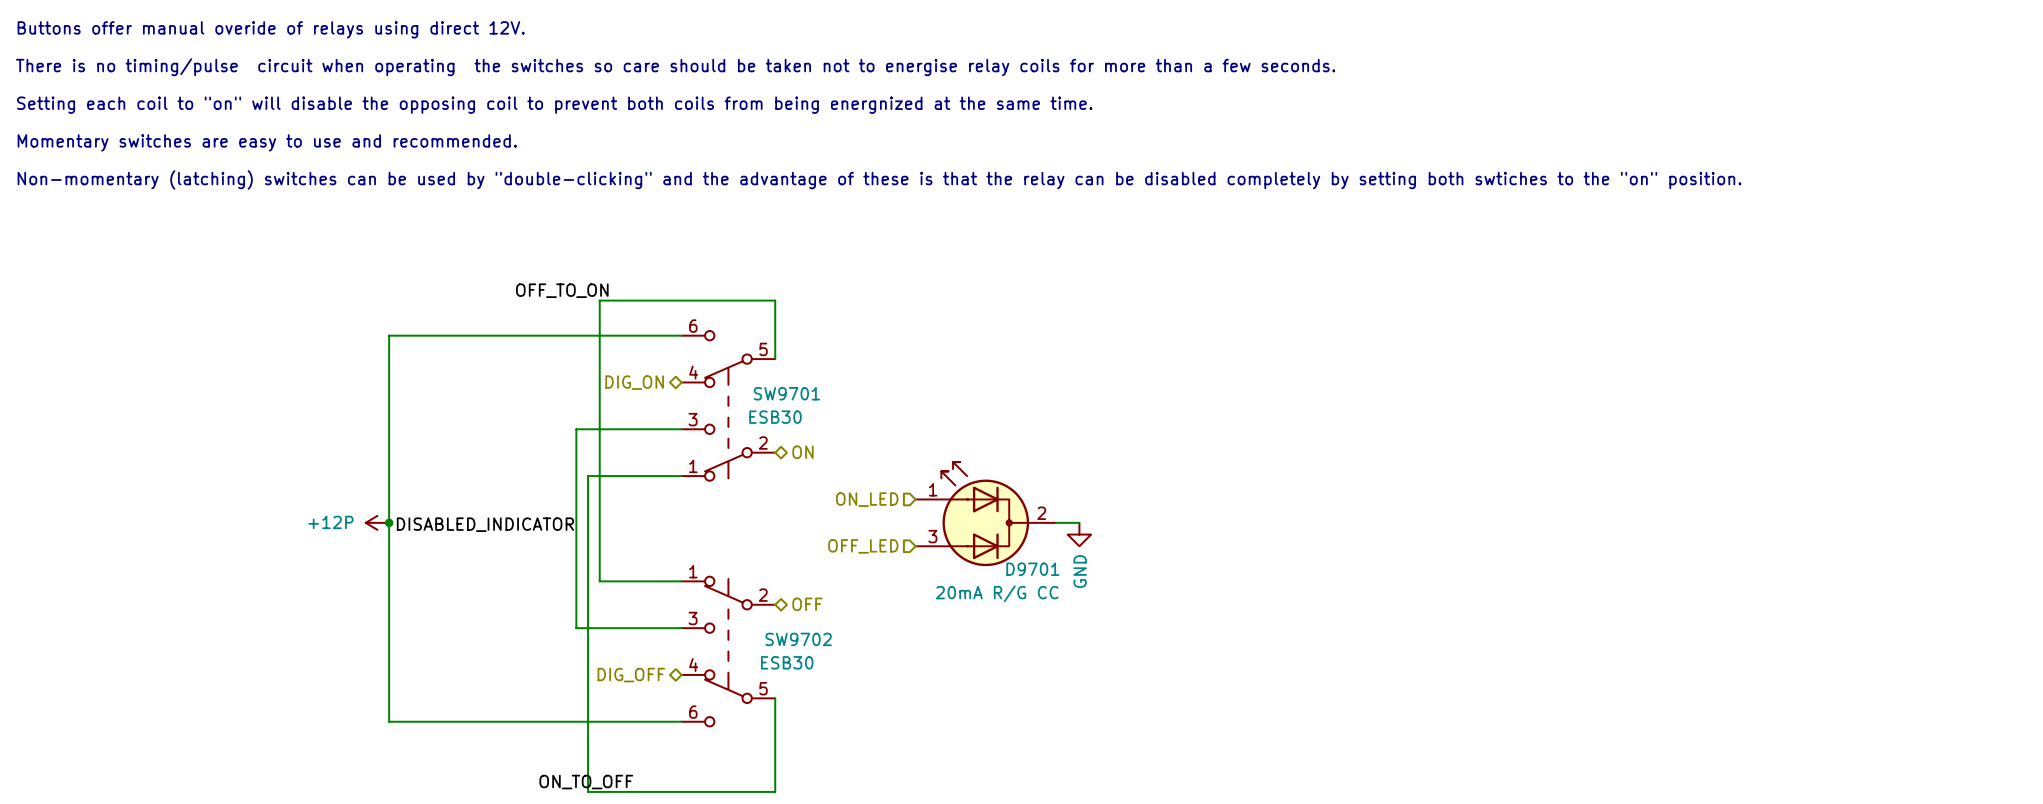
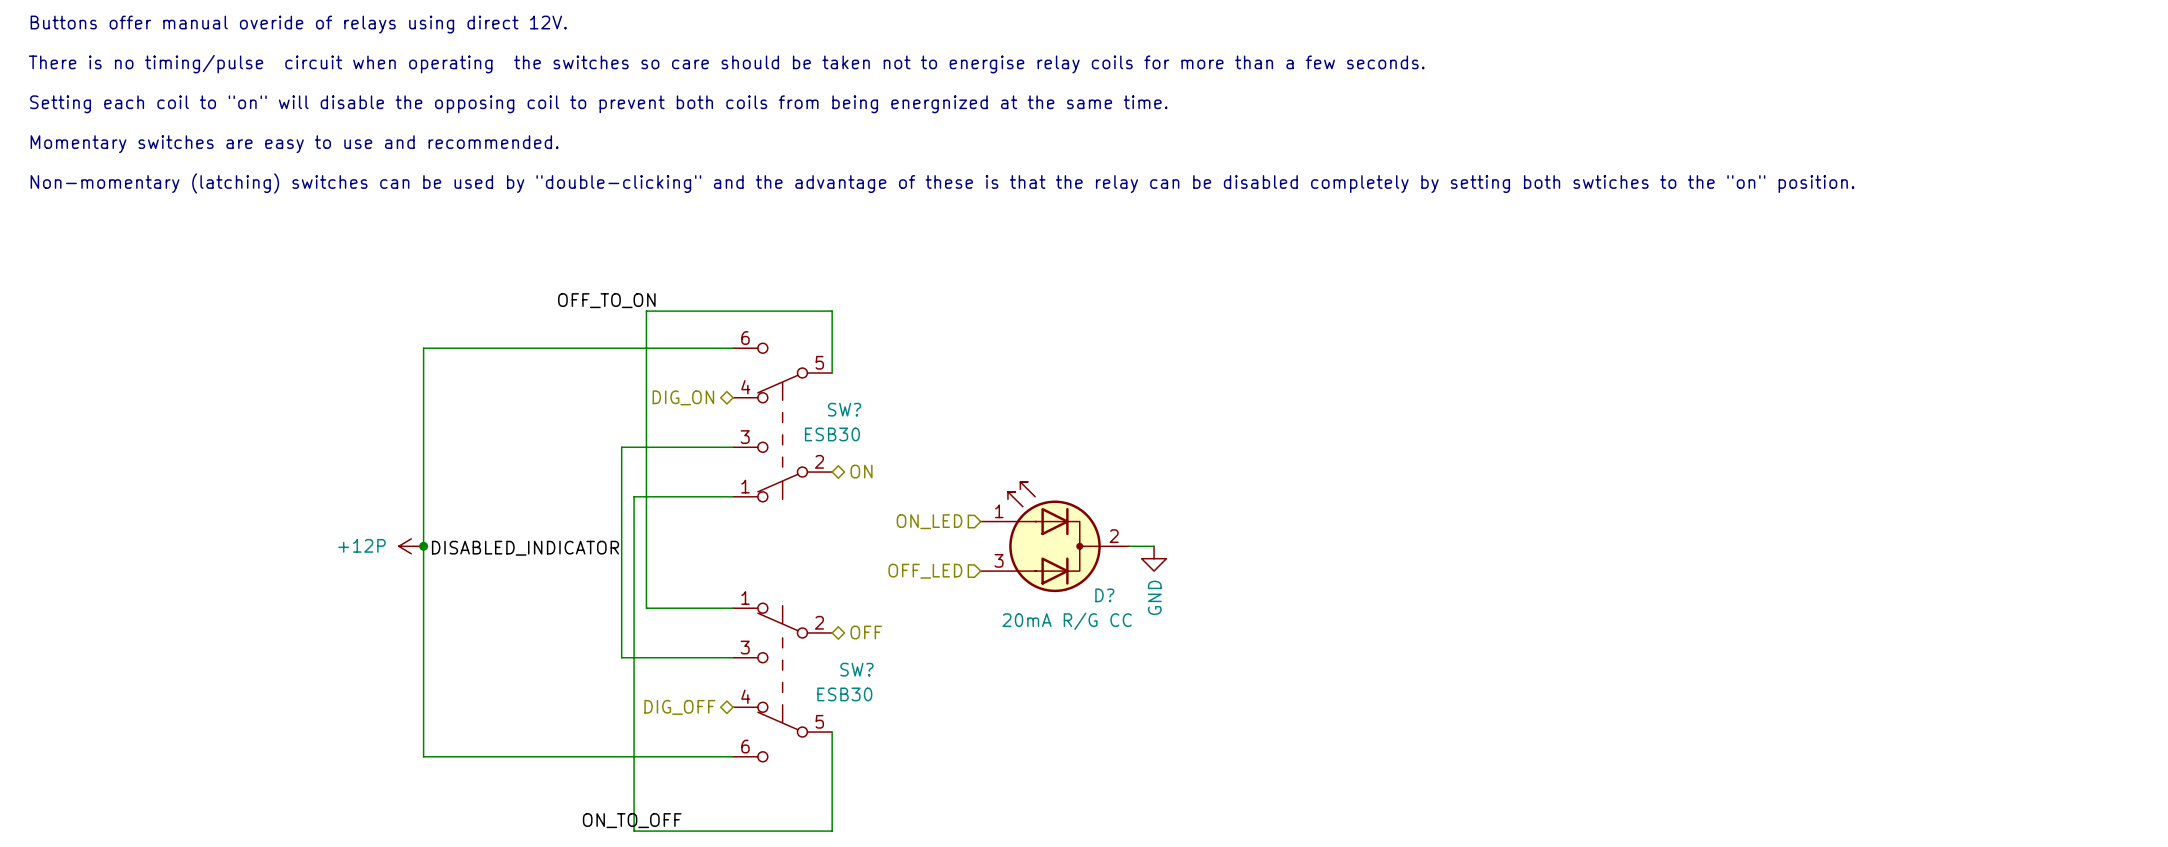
SW9701 name: SW9701 (786, 393) -> SW? (844, 409)
D9701 name: D9701 (1032, 569) -> D? (1104, 595)
SW9702 name: SW9702 (798, 639) -> SW? (856, 669)

